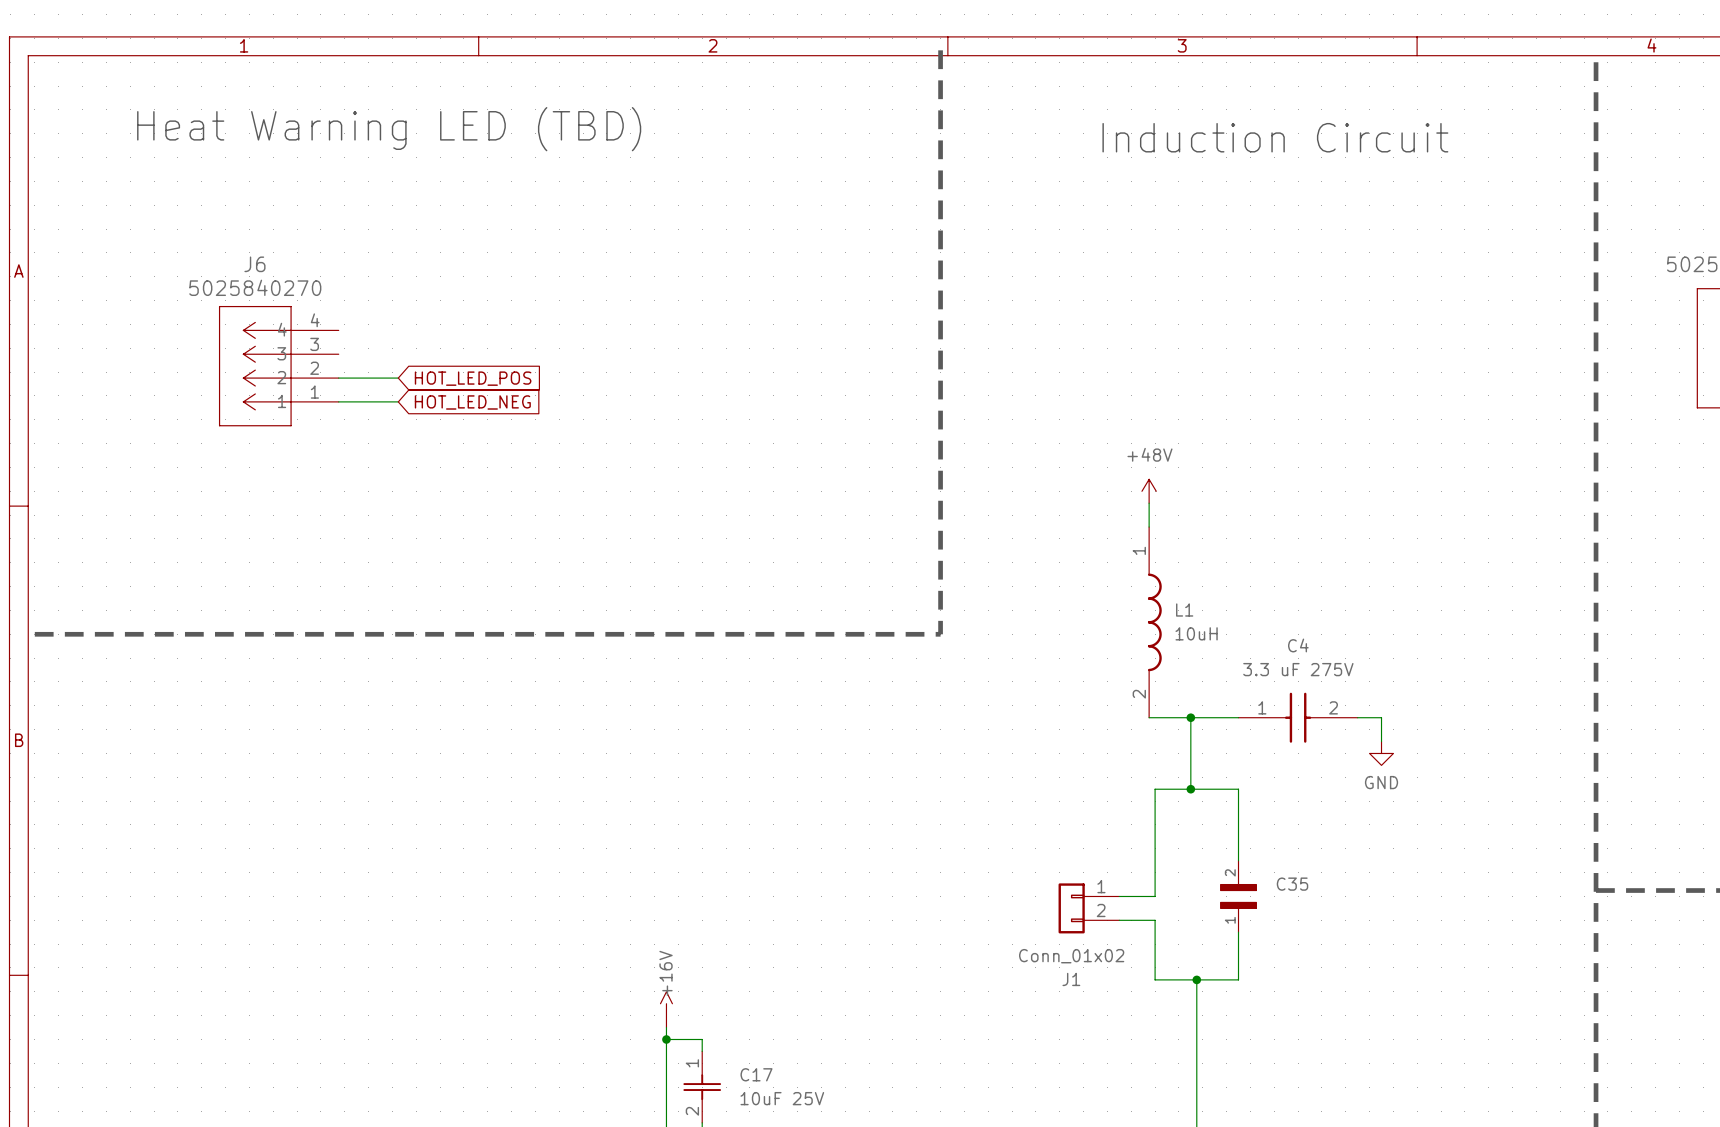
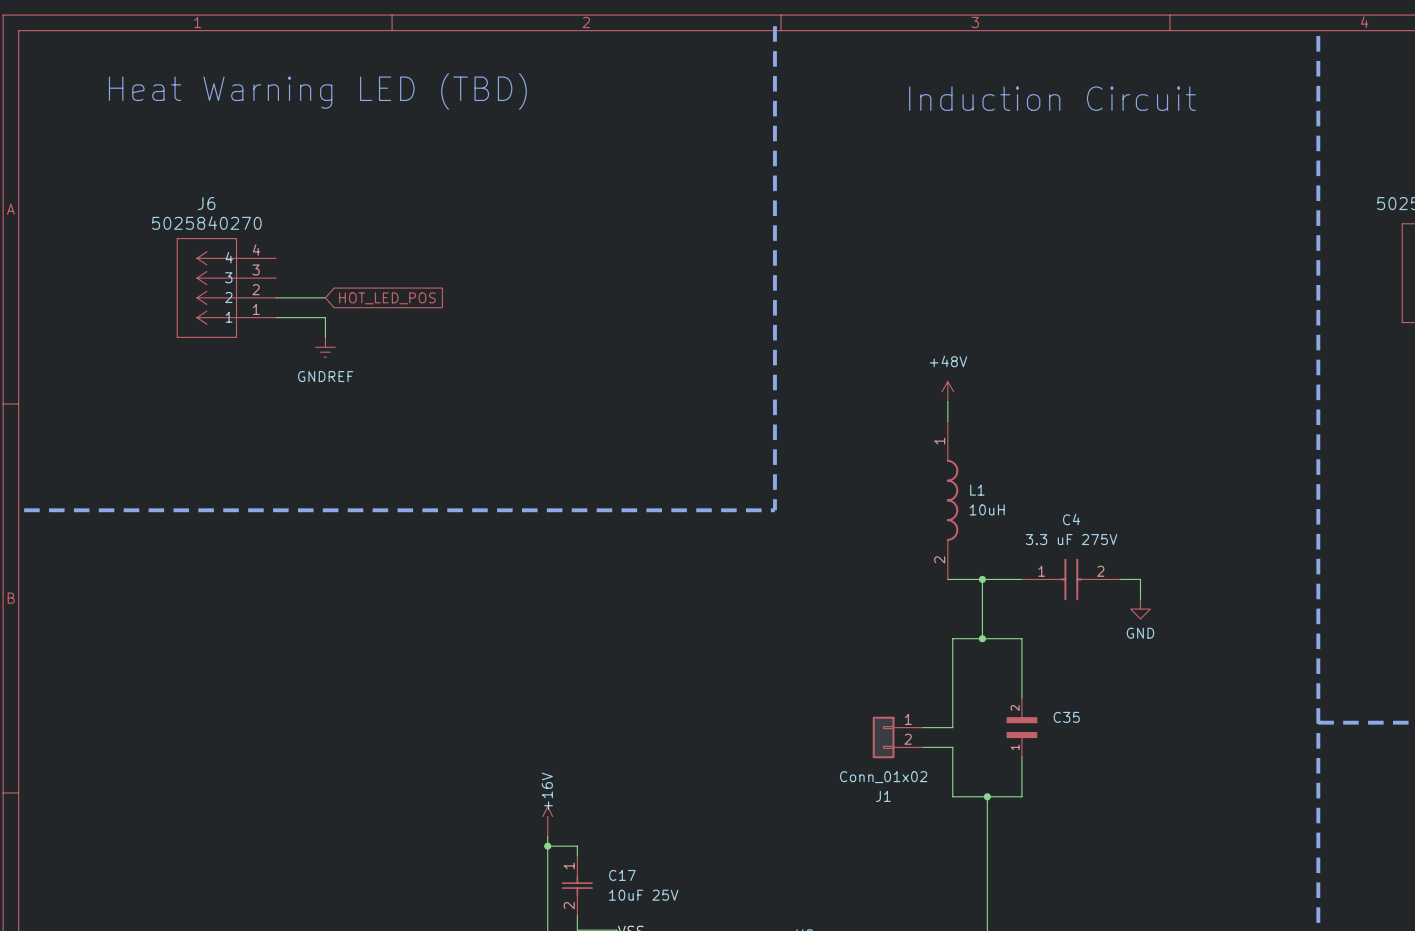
wire: none -> (325, 317) (325, 337)
global label: HOT_LED_NEG (472, 402) -> none
power symbol: none -> GNDREF (325, 347)

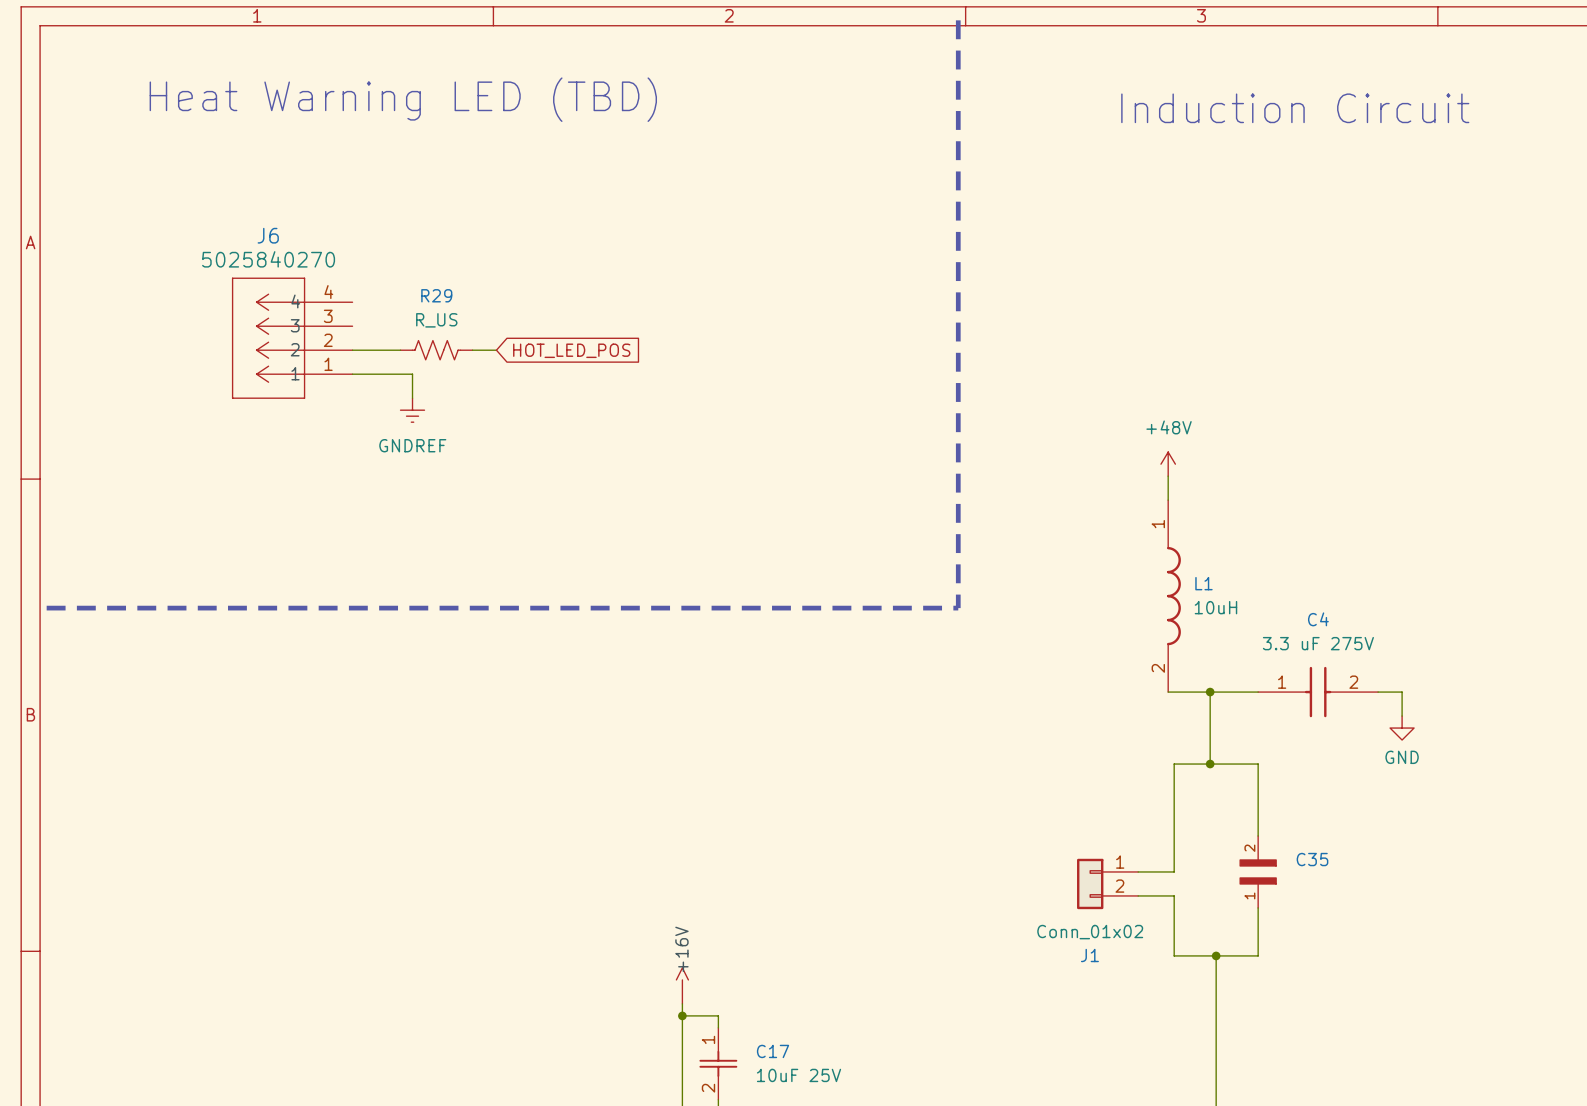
R29: none -> R_US (436, 350)
wire: none -> (472, 350) (496, 350)
global label position: HOT_LED_POS (387, 298) -> HOT_LED_POS (571, 350)

